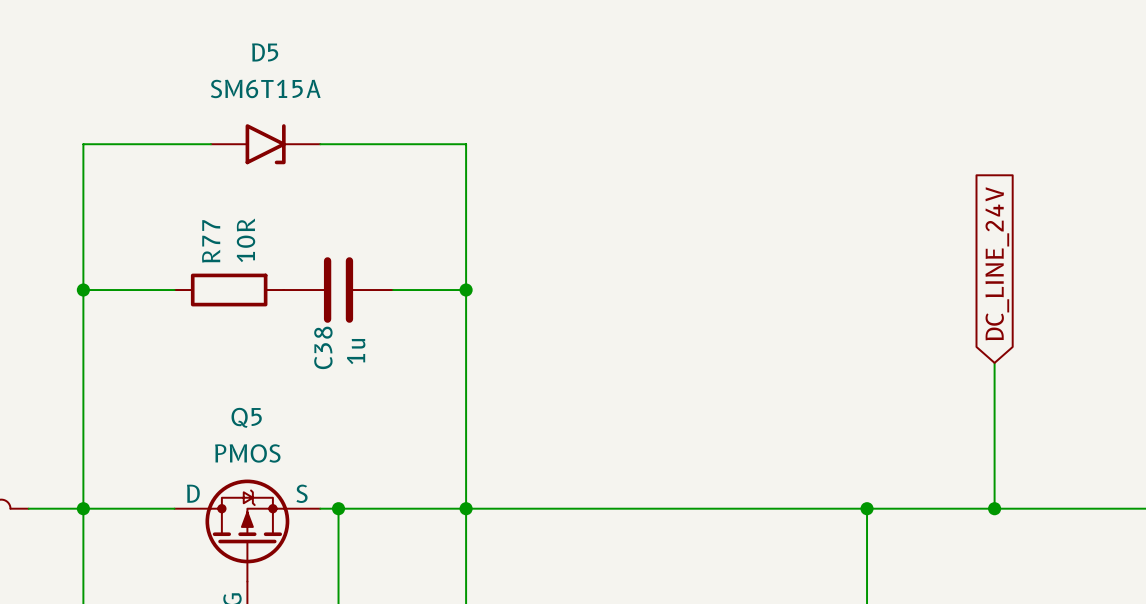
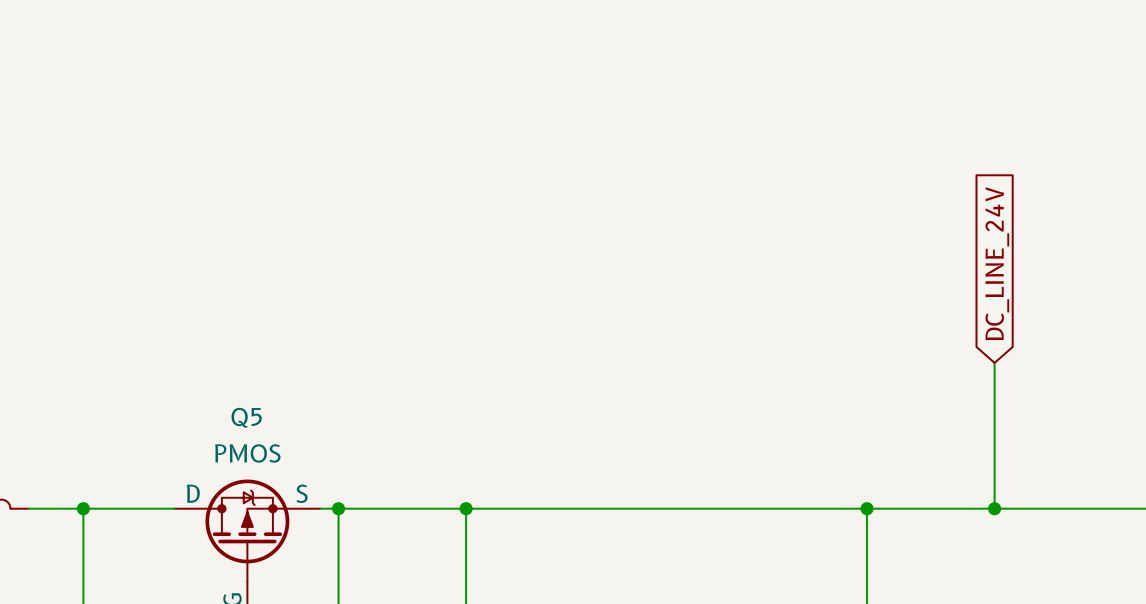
wire: (210, 144) (83, 144) (83, 508) -> none
D5: SM6T15A (265, 144) -> none
wire: (320, 144) (466, 144) (466, 508) -> none
wire: (83, 290) (174, 290) -> none
junction: (83, 290) -> none
R77: 10R (229, 290) -> none
C38: 1u (338, 290) -> none
wire: (393, 290) (466, 290) -> none
junction: (466, 290) -> none

